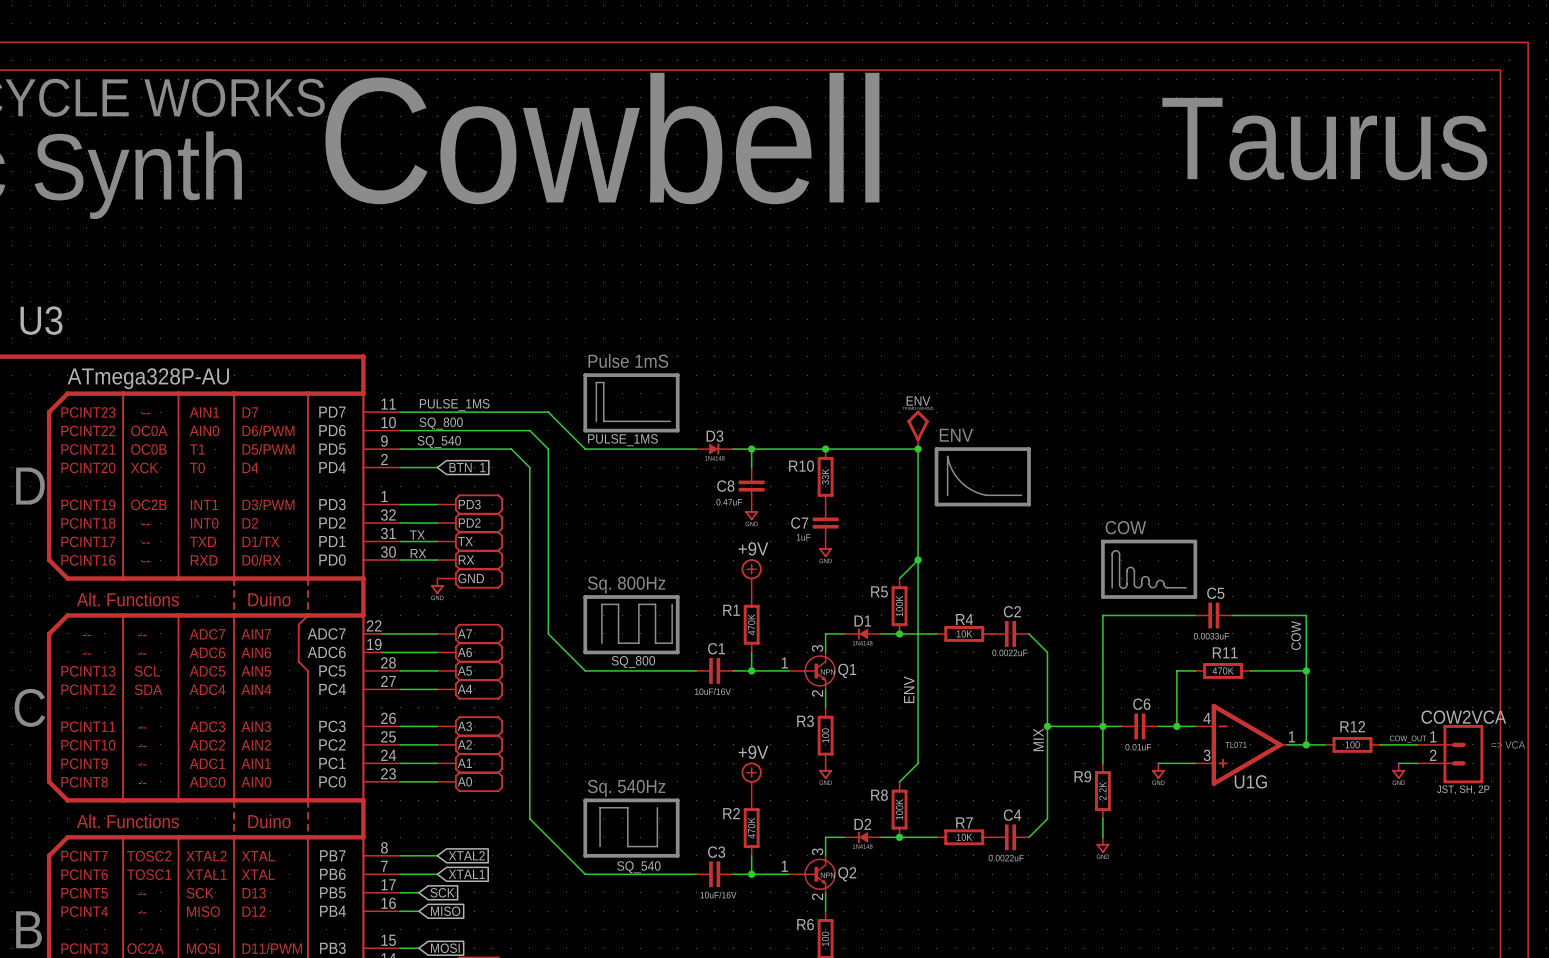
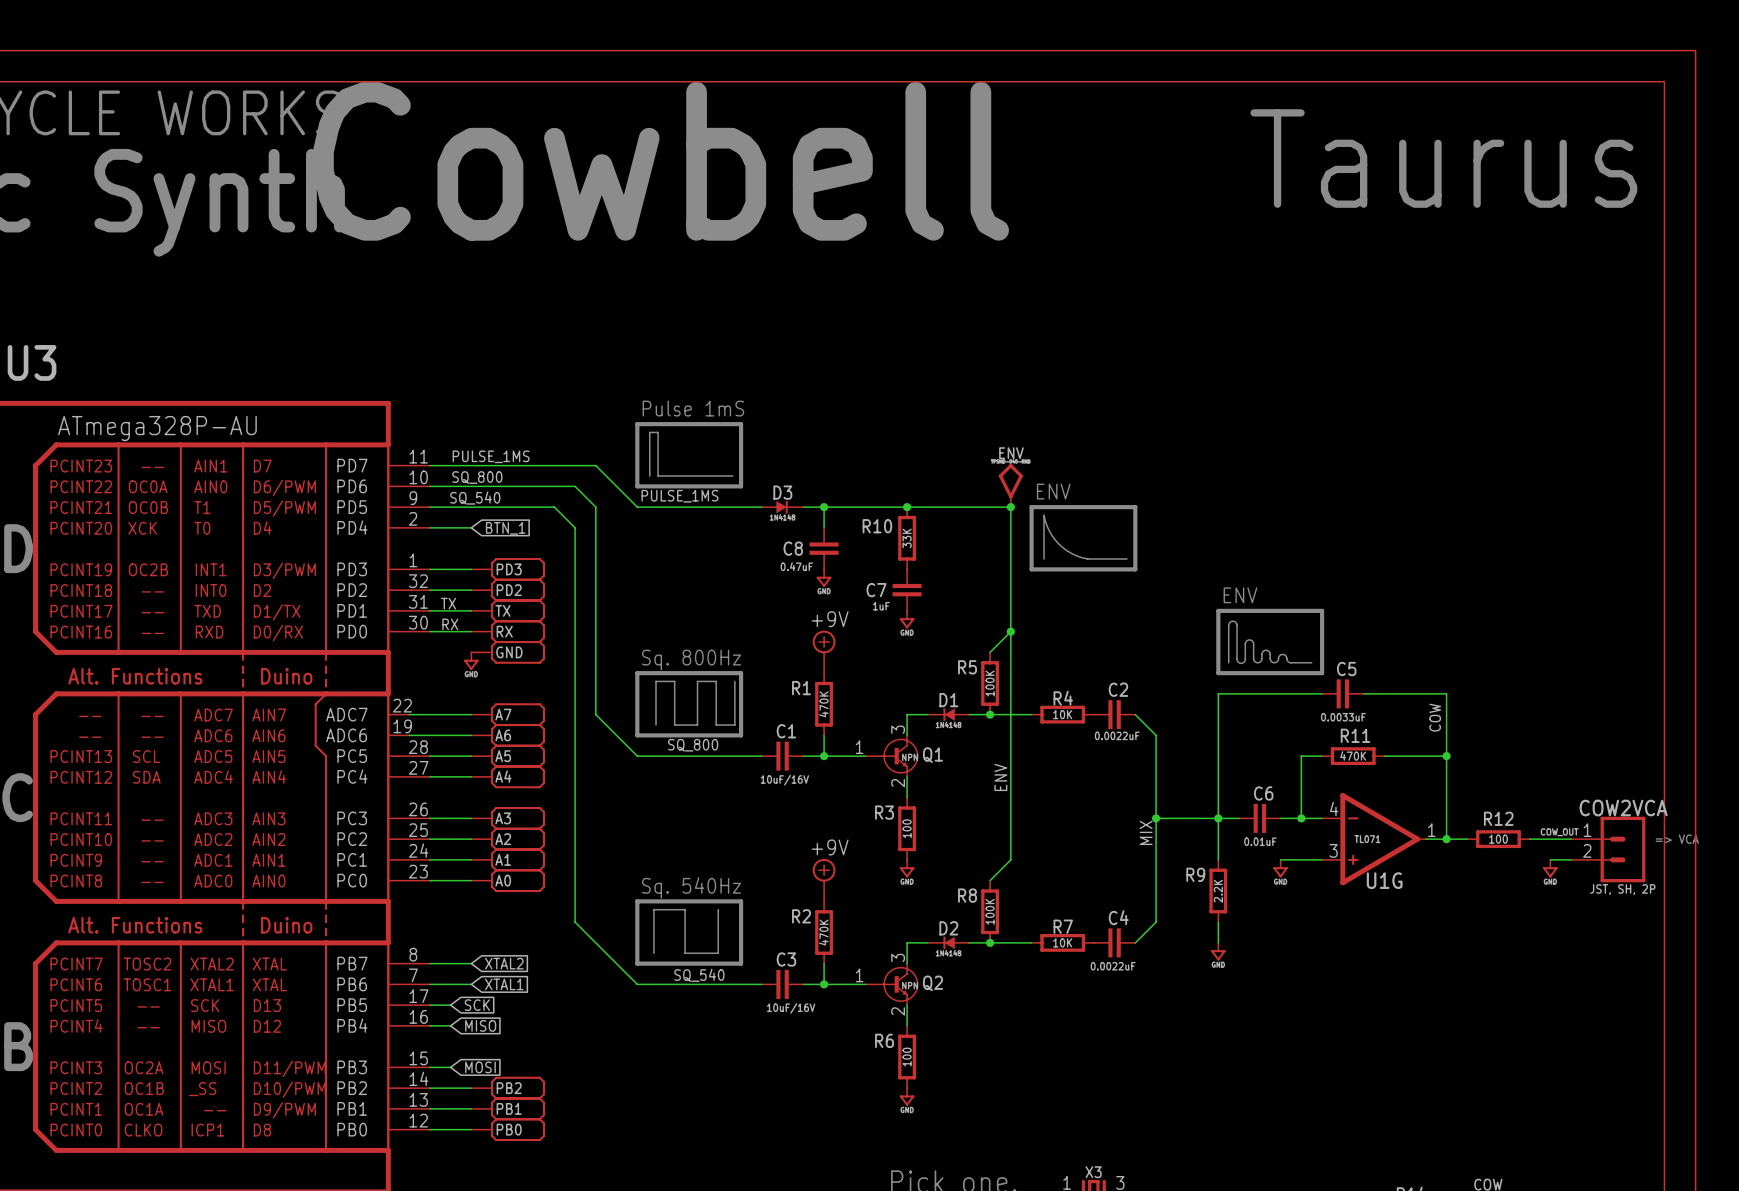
text: COW (1125, 527) -> ENV (1240, 595)

